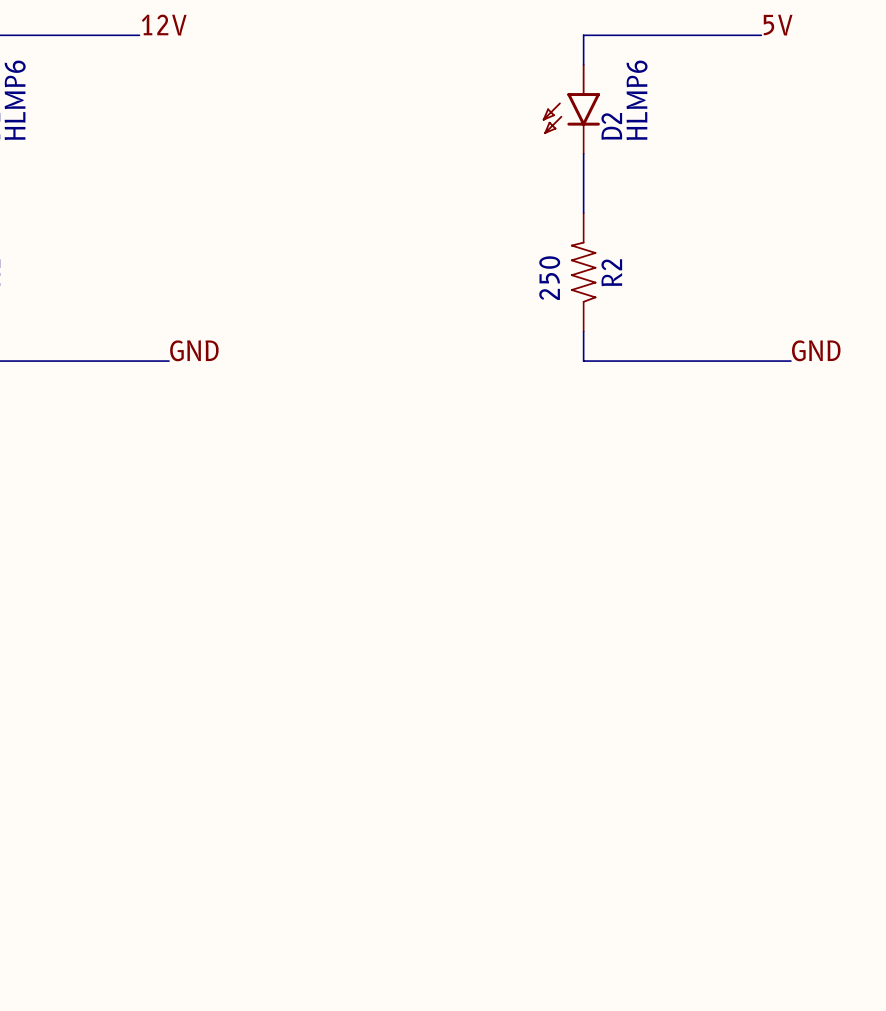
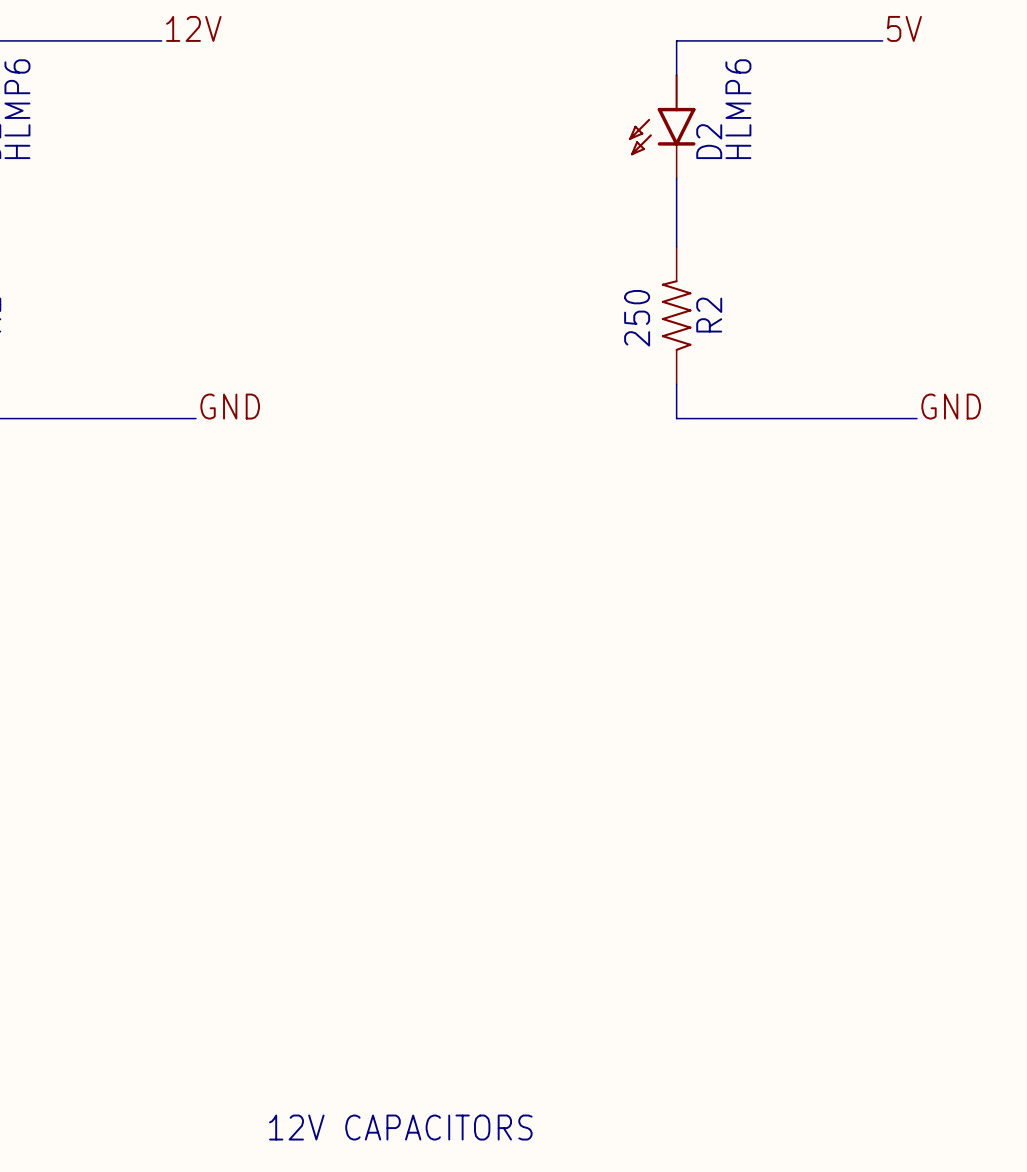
text: none -> 12V CAPACITORS (400, 1127)

